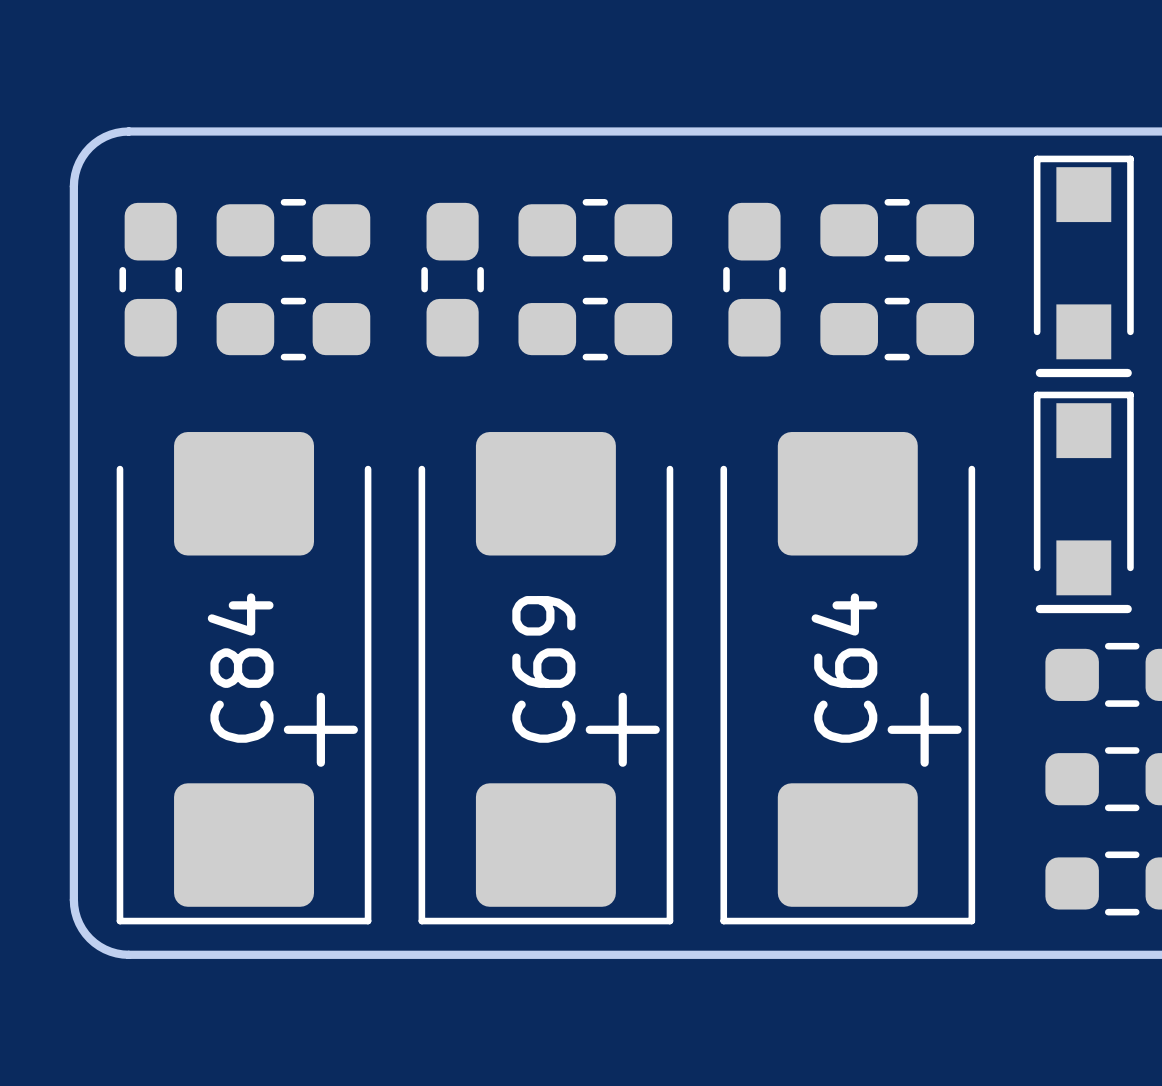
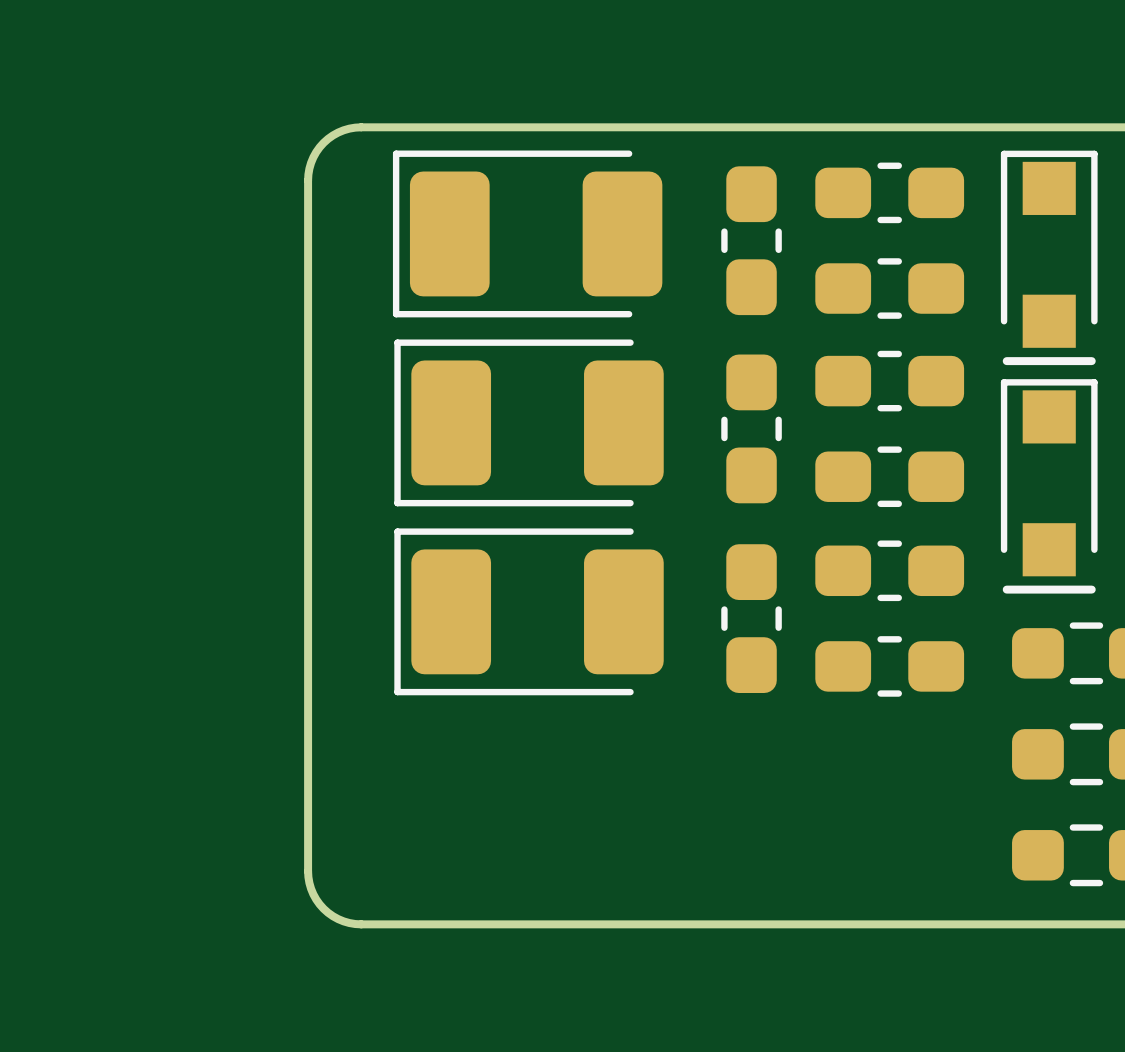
board edge: (373, 131) (116, 132) (99, 139) (85, 152) (76, 168) (73, 186) (73, 899) (76, 918) (82, 929) (94, 942) (104, 949) (122, 954) (373, 954) -> (361, 127) (338, 132) (323, 142) (313, 157) (308, 180) (308, 877) (313, 894) (323, 908) (343, 921) (361, 924)
part: none -> (889, 192)
part: (293, 230) -> none
part: (595, 230) -> none
part: (897, 230) -> none
part: none -> (527, 233)
part: (150, 279) -> none
part: (452, 279) -> none
part position: (754, 279) -> (751, 240)
part: none -> (889, 288)
part: (293, 329) -> none
part: (595, 329) -> none
part: (897, 329) -> none
part: none -> (889, 381)
part: none -> (529, 422)
part: none -> (751, 428)
part: none -> (889, 476)
part: none -> (889, 570)
part: none -> (529, 611)
part: none -> (751, 618)
C84: (244, 678) -> none
C69: (545, 678) -> none
C64: (847, 678) -> none
part: none -> (889, 666)
line: (320, 696) (320, 762) -> none
line: (622, 696) (622, 762) -> none
line: (924, 696) (924, 762) -> none
line: (287, 729) (353, 729) -> none
line: (589, 729) (655, 729) -> none
line: (891, 729) (957, 729) -> none

